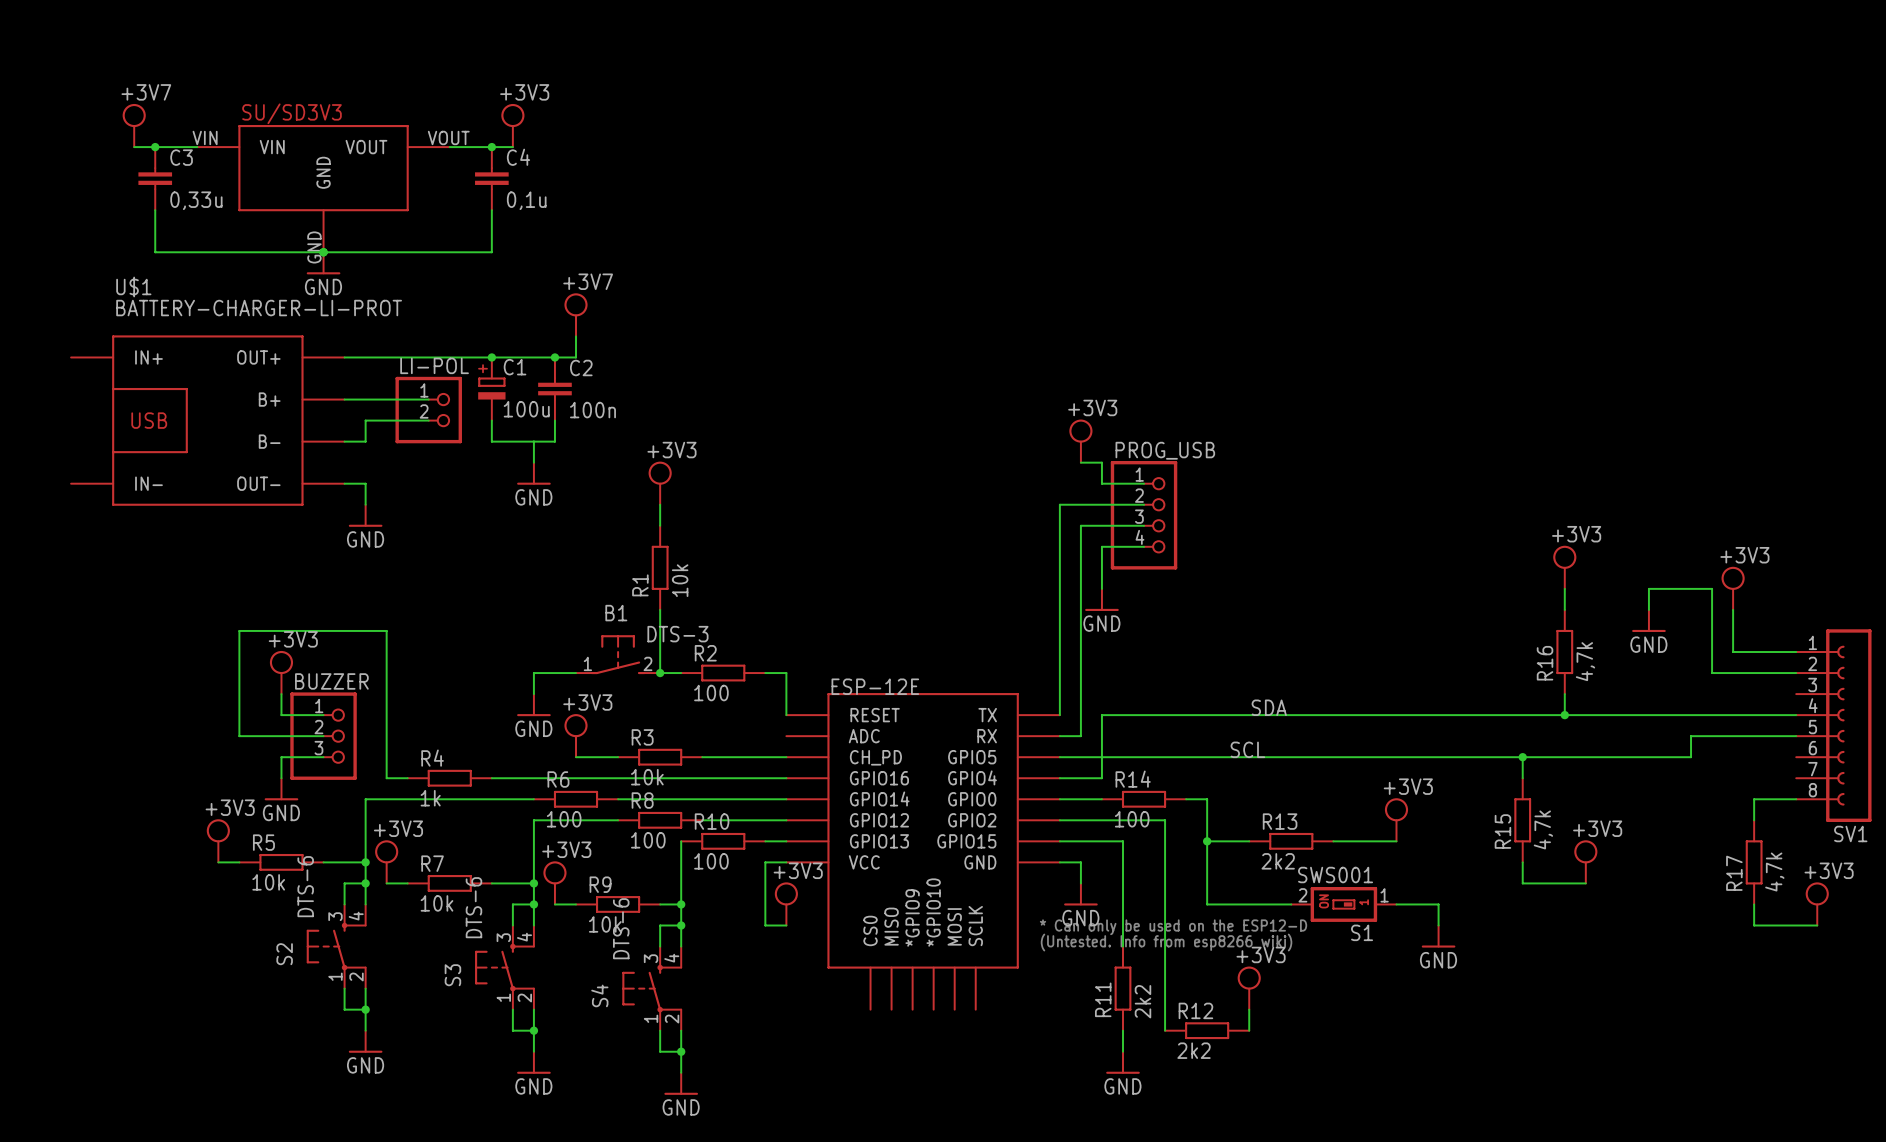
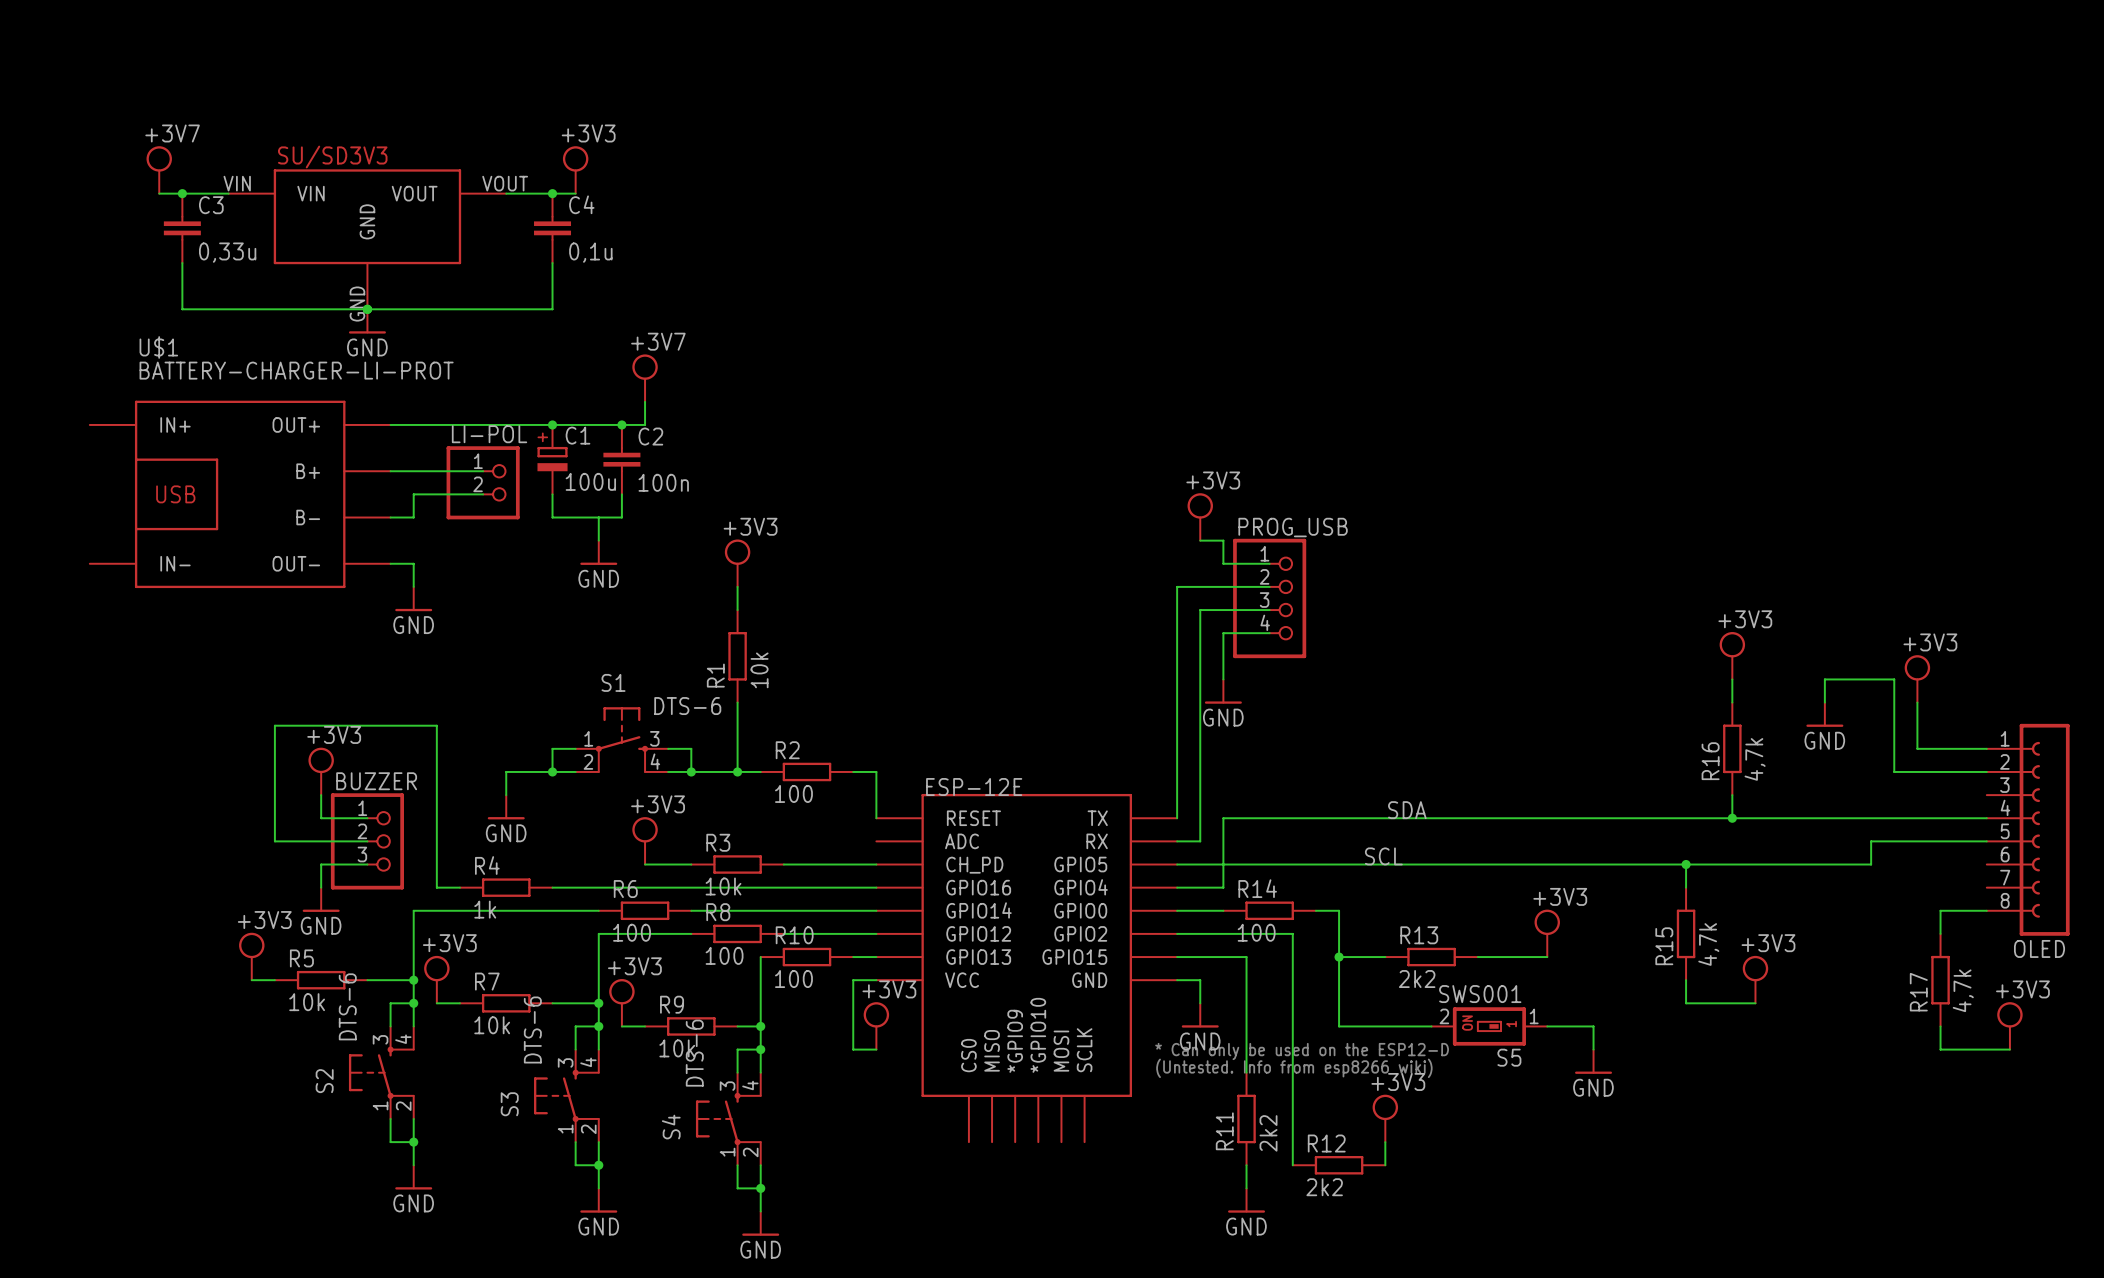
S1: none -> DTS-6 (621, 739)
wire: none -> (575, 748) (552, 748) (552, 771)
wire: none -> (668, 748) (691, 748) (691, 771)
B1: DTS-3 (618, 654) -> none
junction: none -> (552, 771)
wire: none -> (575, 771) (506, 771) (506, 795)
wire: (576, 673) (533, 673) (533, 694) -> none
wire: none -> (668, 771) (737, 771)
junction: none -> (691, 771)
power symbol position: GND (533, 705) -> GND (506, 807)
SV1 name: SV1 (1850, 833) -> OLED (2039, 948)
S1 name: S1 (1362, 932) -> S5 (1509, 1057)

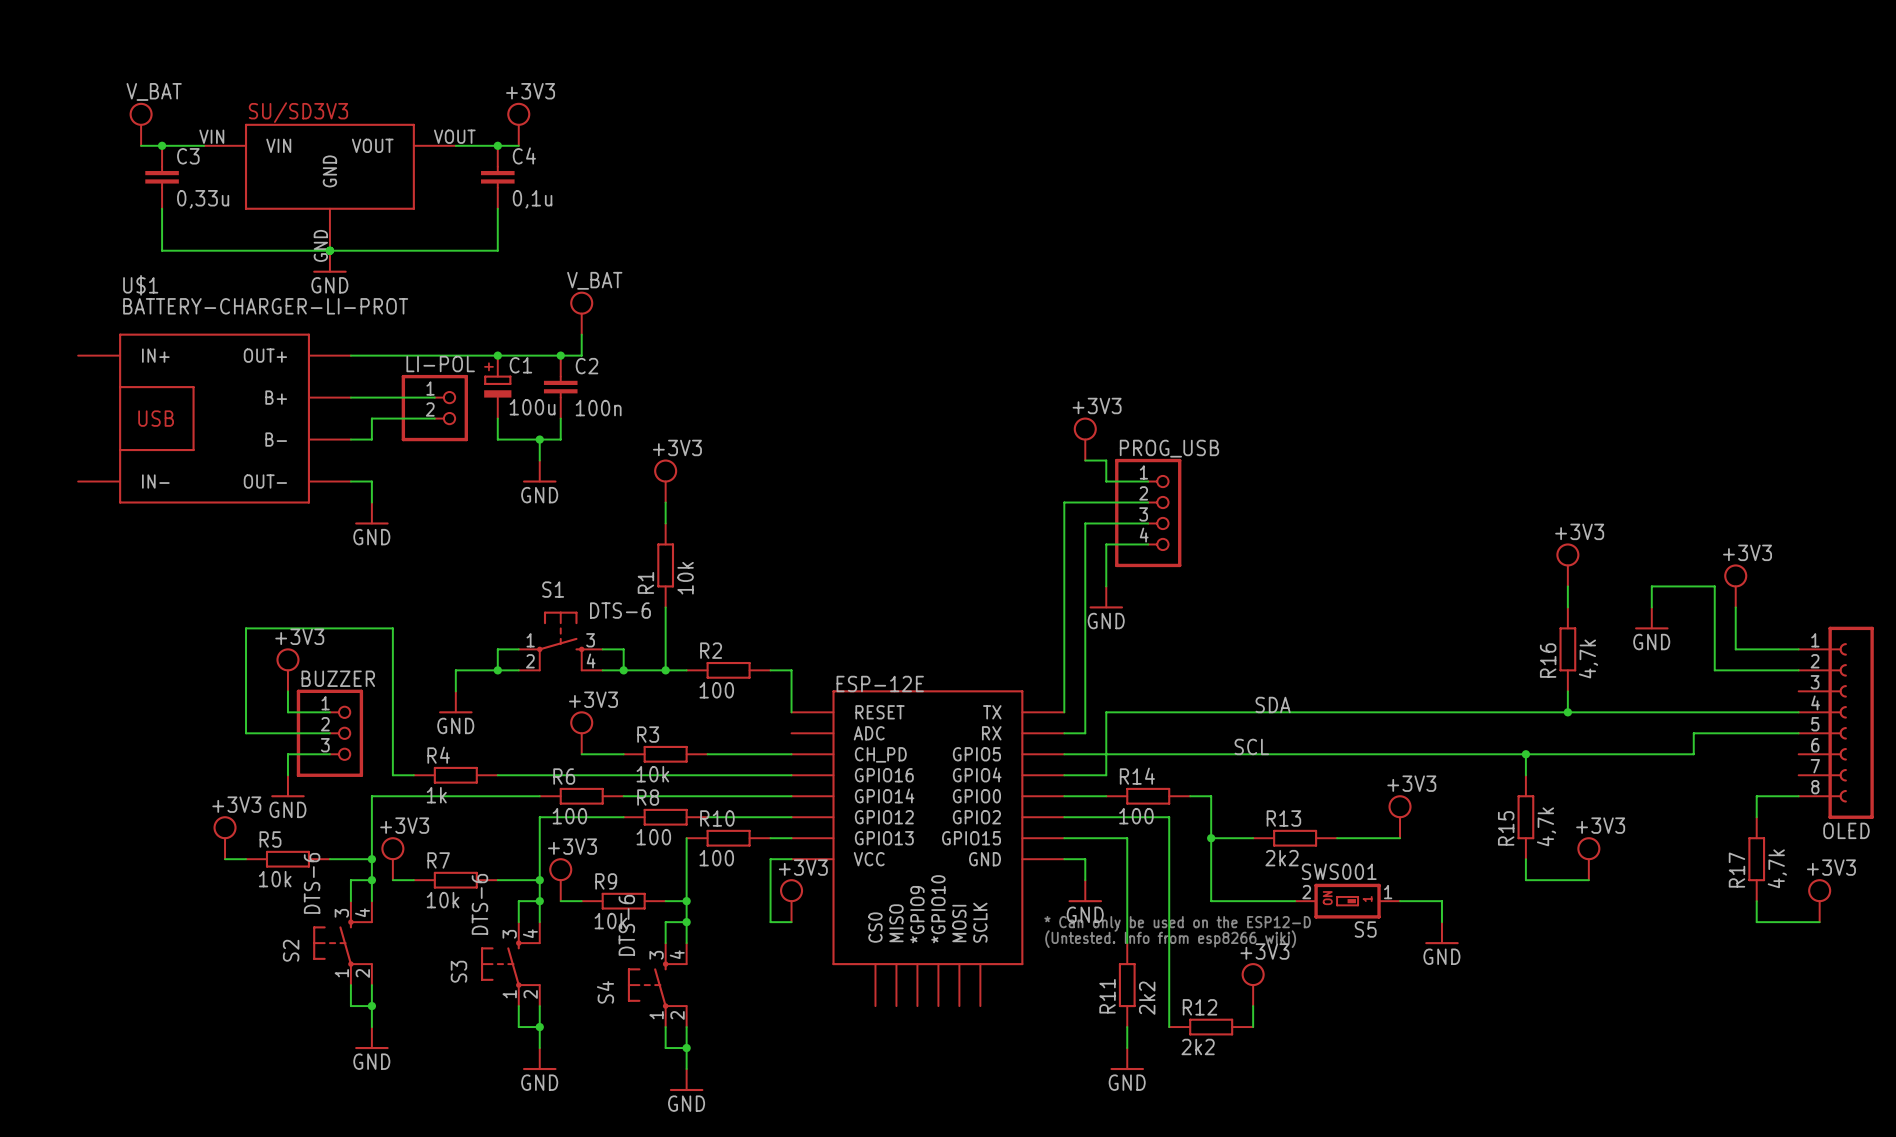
power symbol: +3V7 (159, 169) -> V_BAT (141, 124)
power symbol: +3V7 (645, 378) -> V_BAT (581, 313)
junction: none -> (539, 439)

